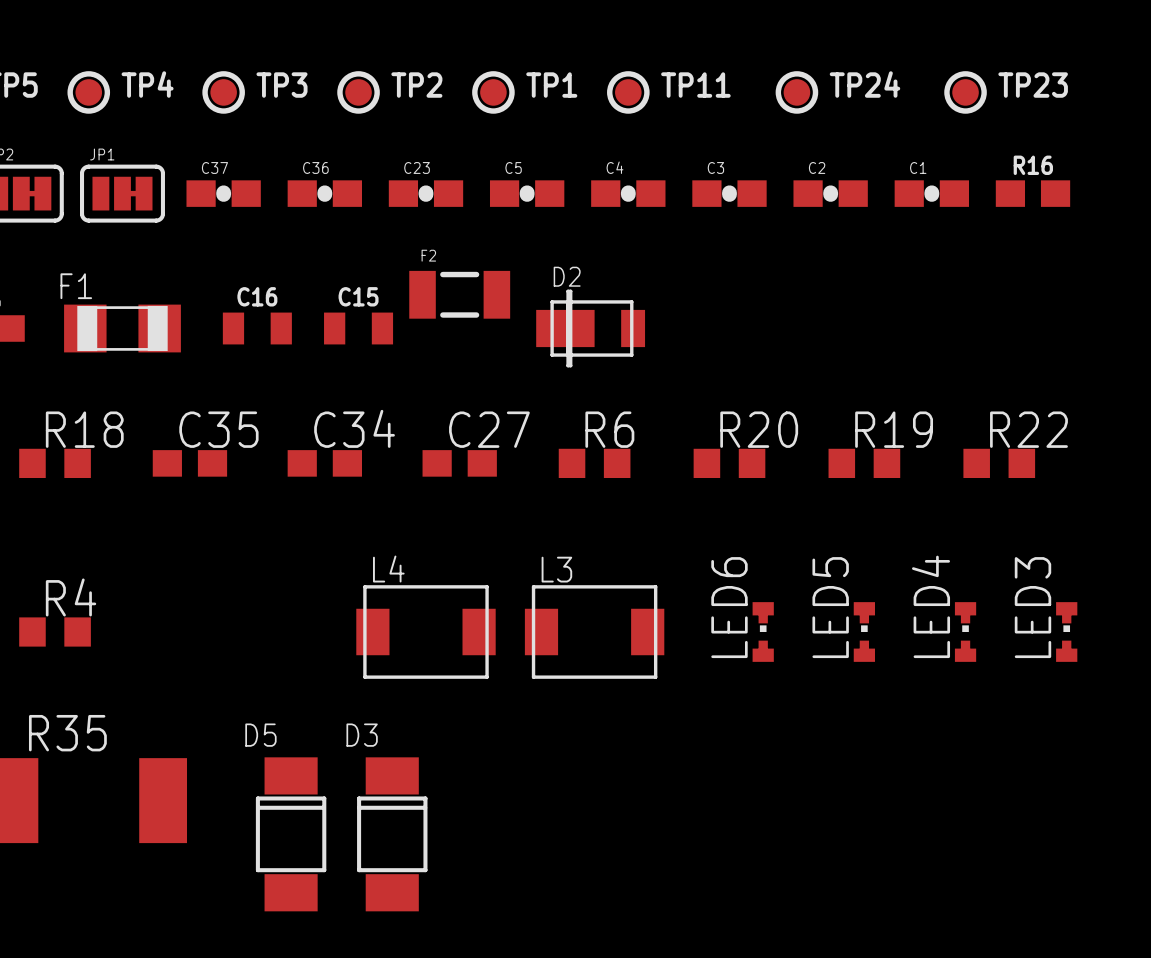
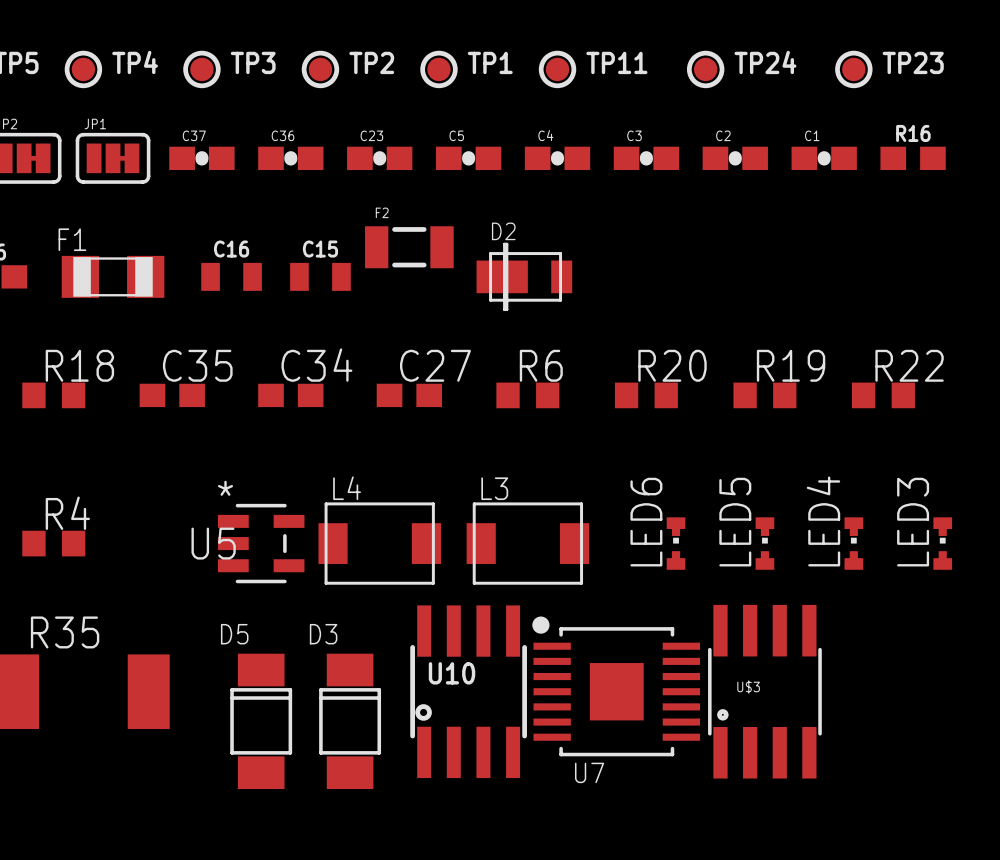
U5: none -> (261, 543)
U7: none -> (616, 686)
U10: none -> (468, 691)
U$3: none -> (764, 691)

